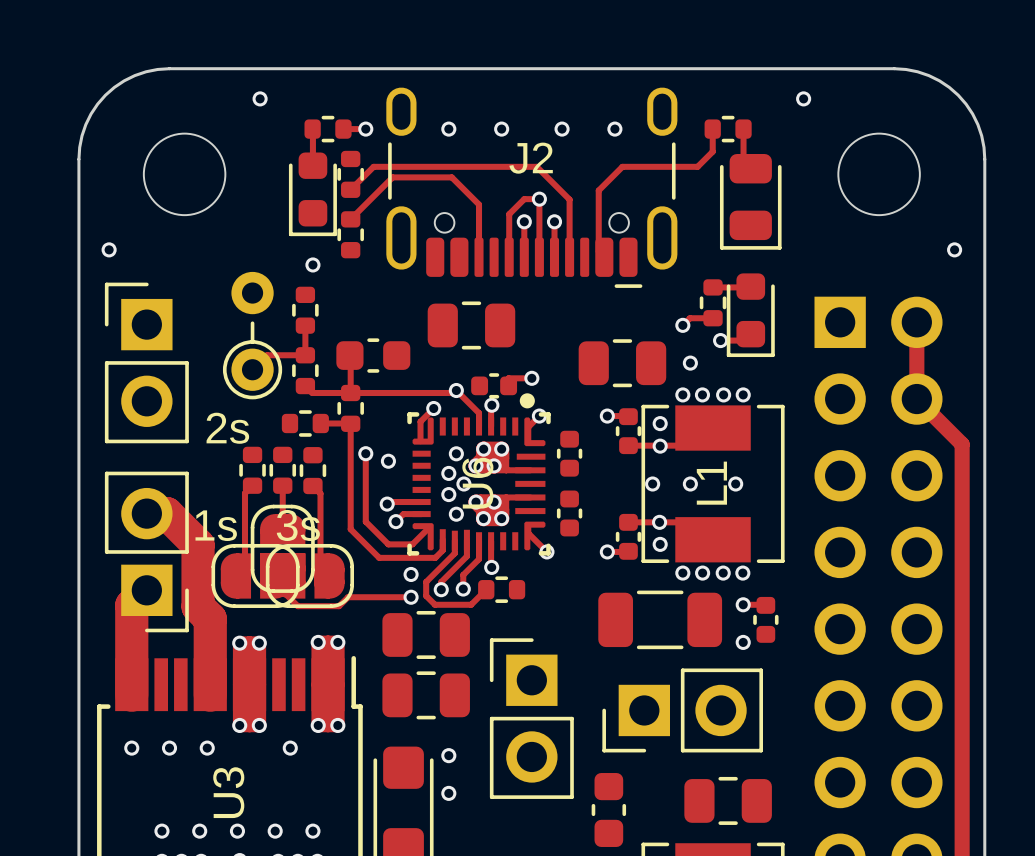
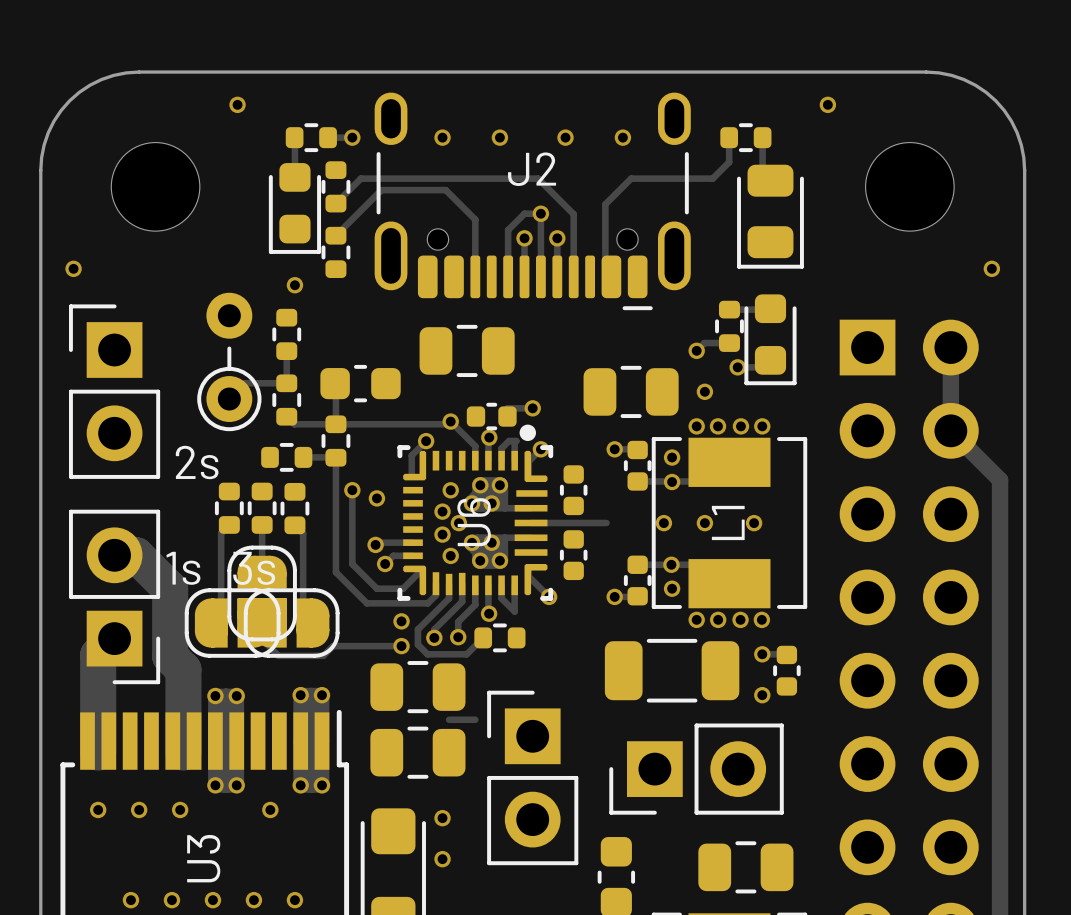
track: none -> (501, 460) (501, 448) (509, 441) (516, 441) (514, 460)
track: none -> (531, 523) (606, 523)
track: none -> (501, 585) (501, 598) (514, 611) (514, 585)
track: none -> (449, 719) (475, 719)

